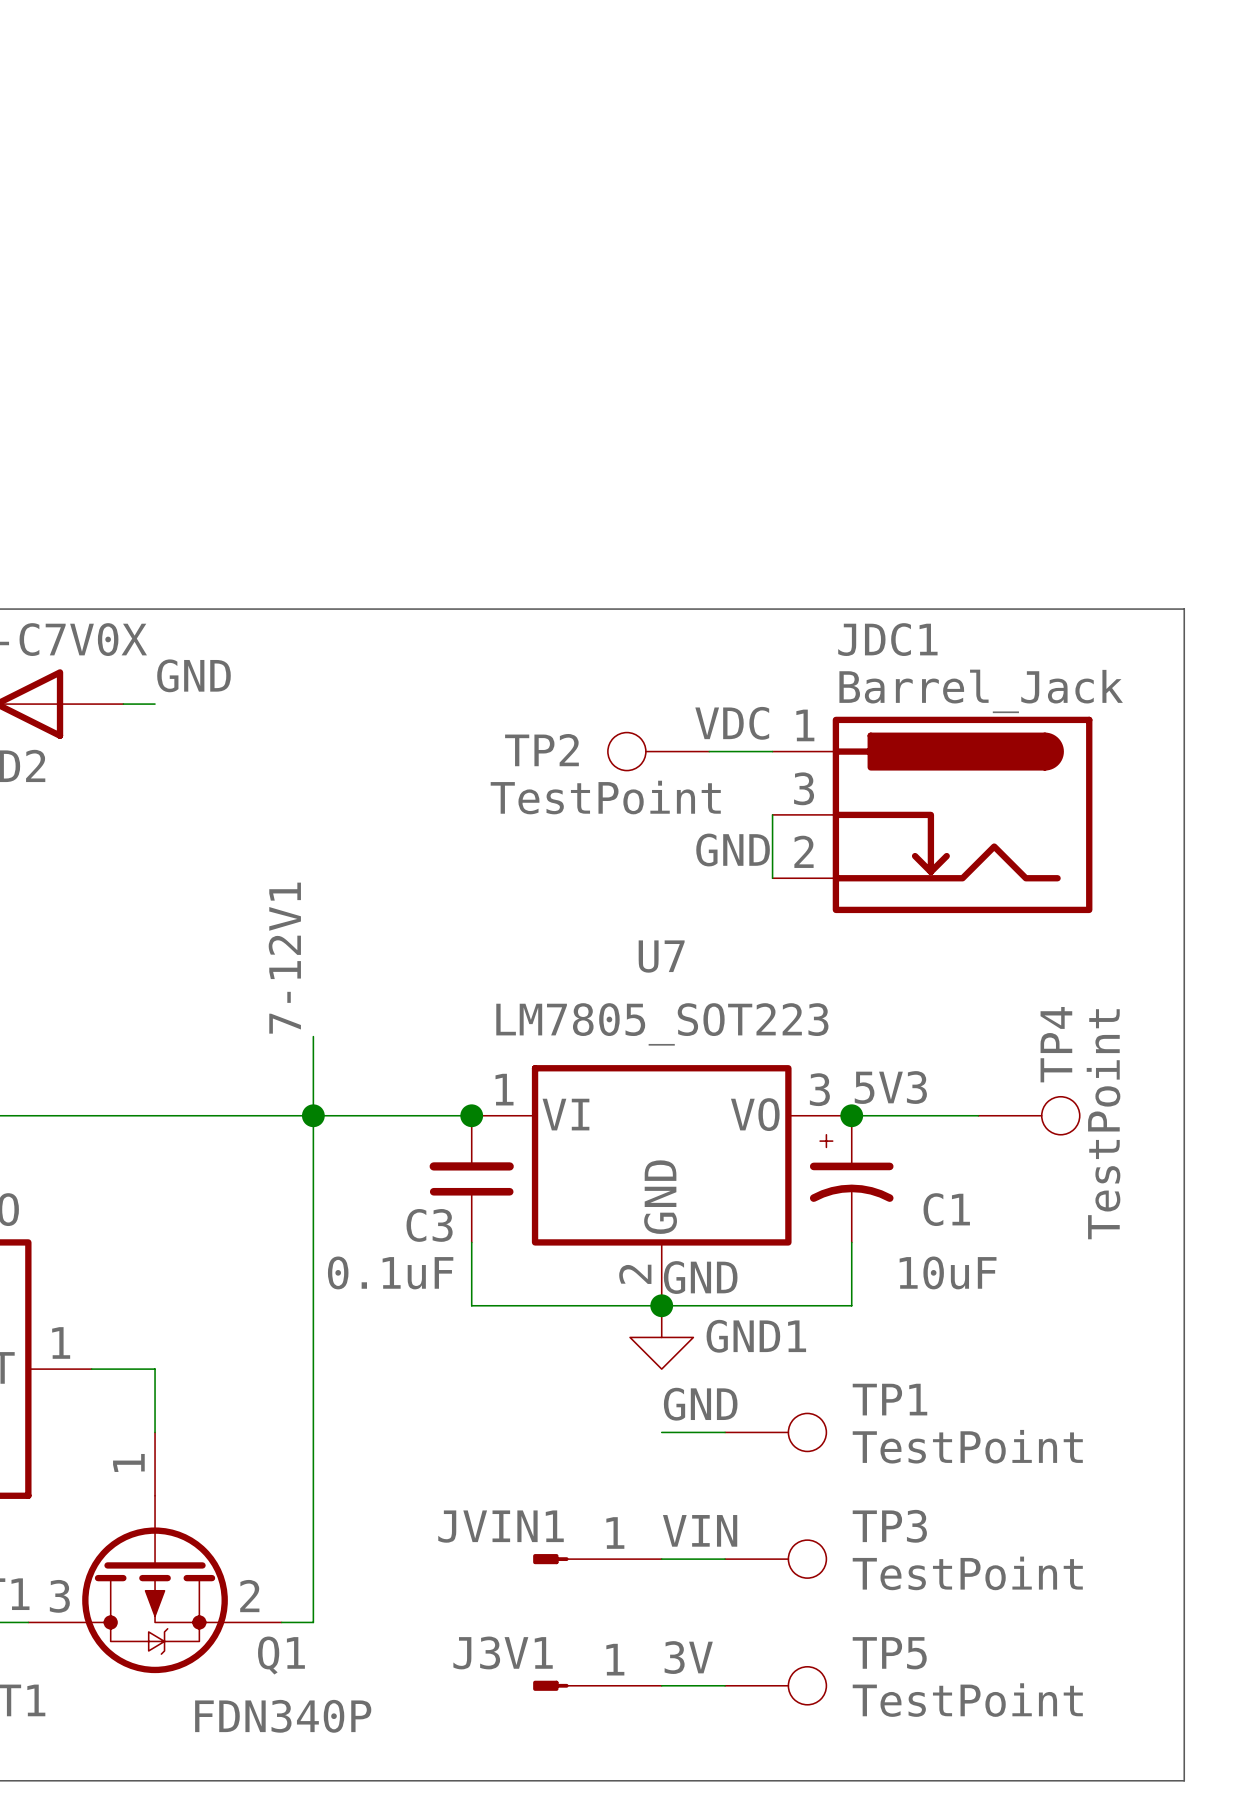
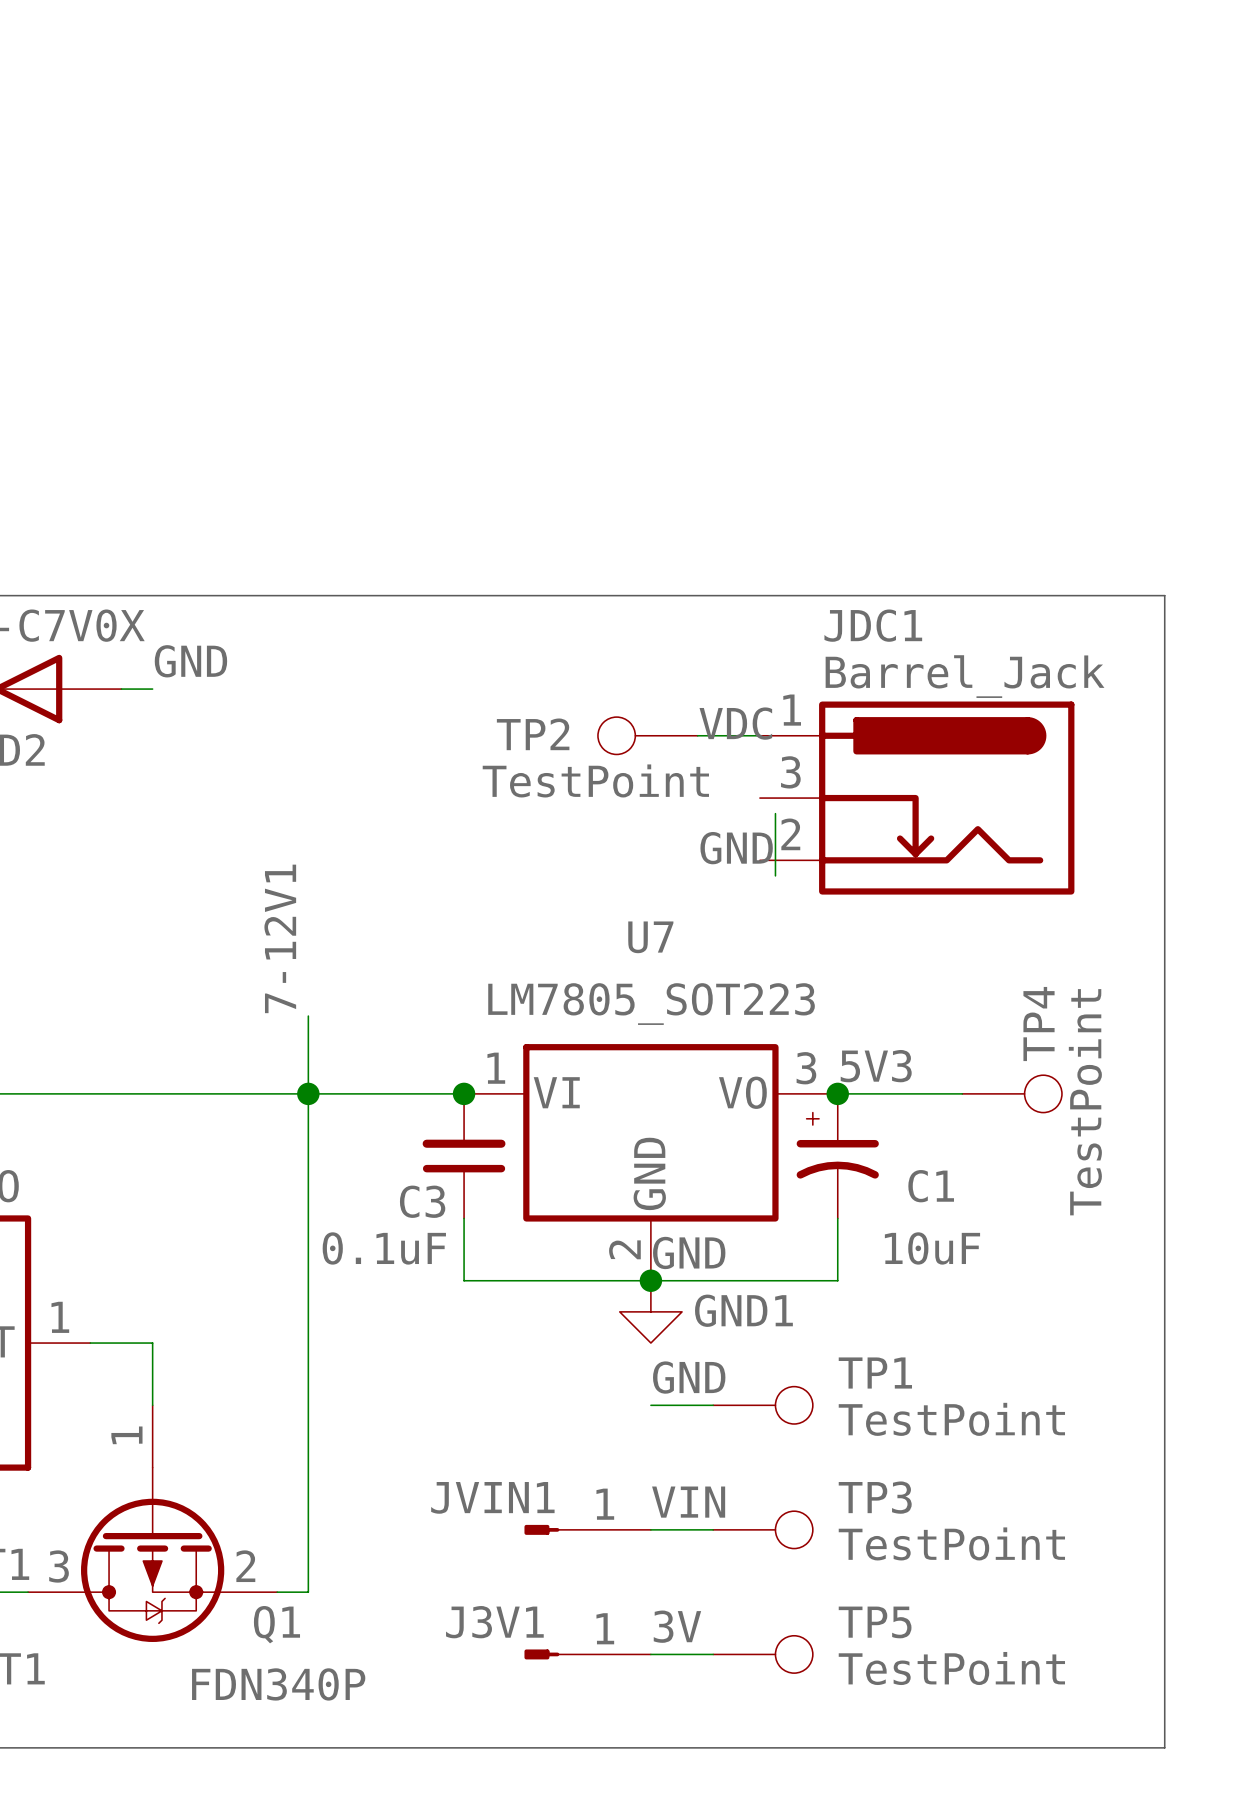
label position: VDC (732, 723) -> VDC (735, 723)
wire: (772, 814) (772, 878) -> (775, 813) (775, 875)
label position: GND (733, 850) -> GND (736, 848)

